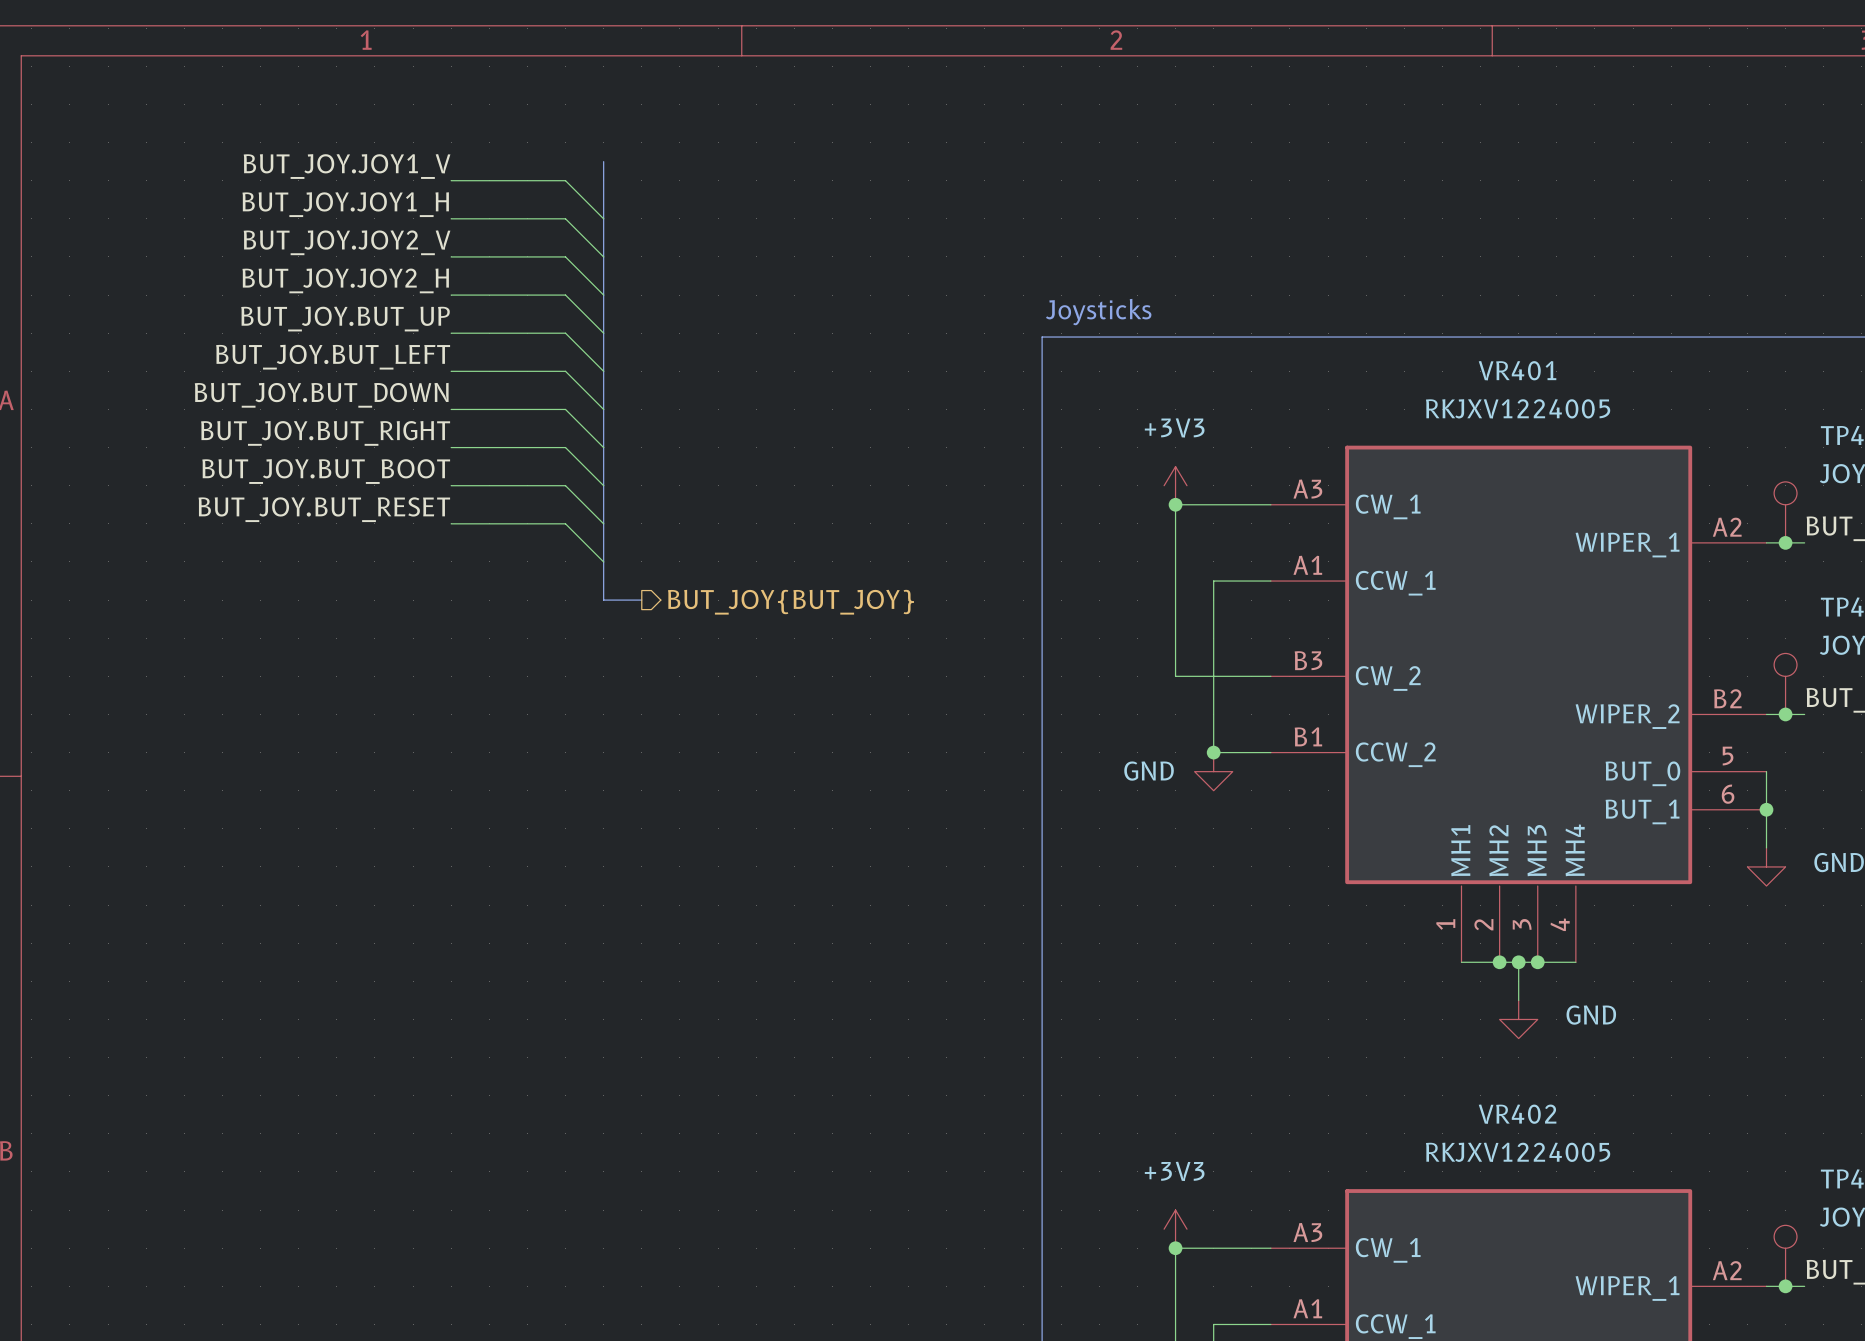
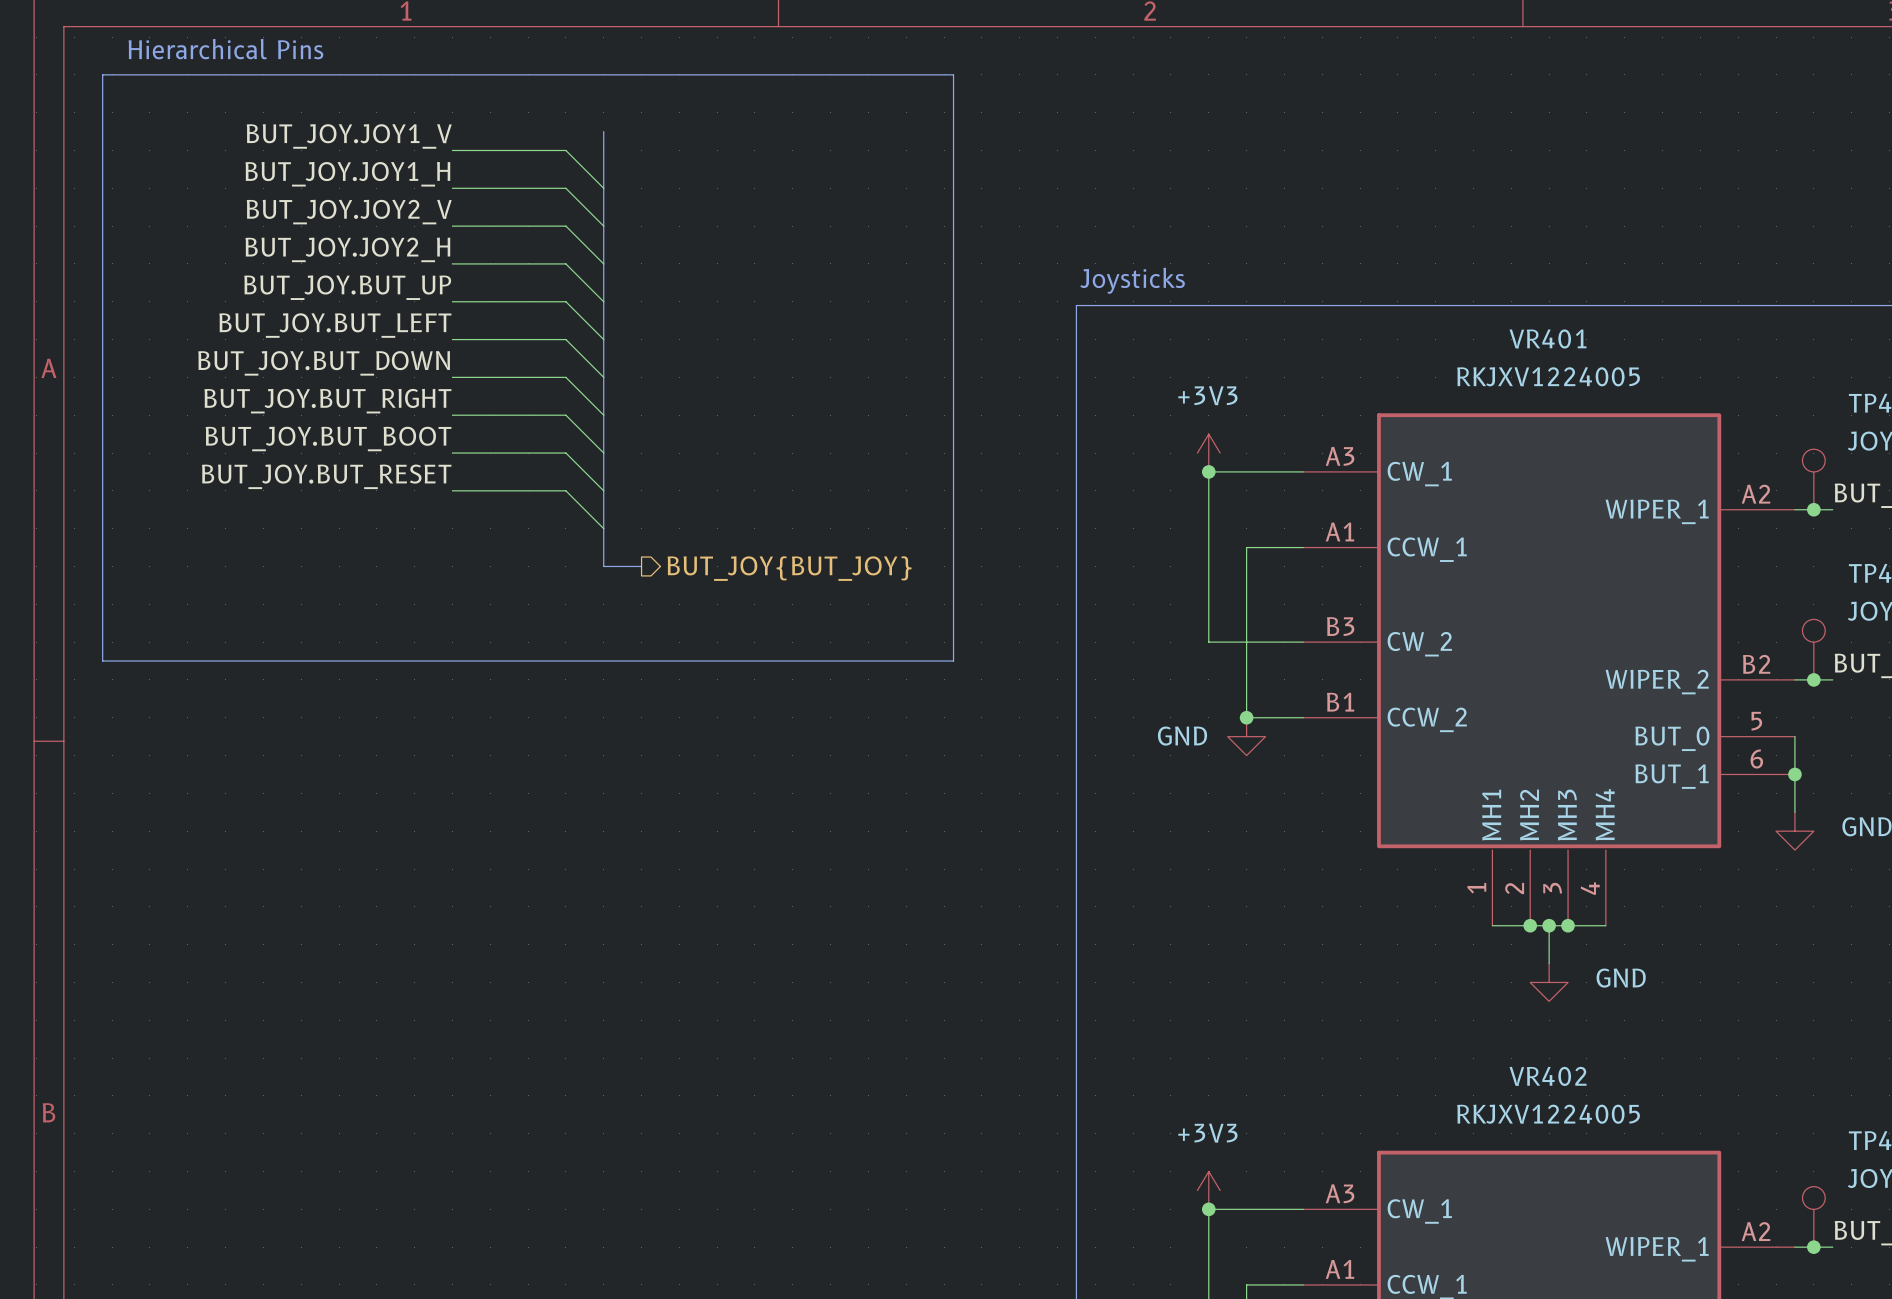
text: none -> Hierarchical Pins (225, 49)
line: none -> (102, 74) (953, 74) (953, 661) (102, 661) (102, 74)
bus: (603, 161) (603, 600) (641, 600) -> (603, 131) (603, 566) (641, 566)
label position: BUT_JOY.JOY1_V (347, 166) -> BUT_JOY.JOY1_V (349, 136)
wire: none -> (452, 150) (490, 150)
wire: (527, 180) (565, 180) (603, 218) -> (565, 150) (603, 188)
label position: BUT_JOY.JOY1_H (345, 204) -> BUT_JOY.JOY1_H (347, 174)
wire: none -> (452, 188) (490, 188)
wire: (527, 218) (565, 218) (603, 256) -> (565, 188) (603, 226)
label position: BUT_JOY.JOY2_V (347, 242) -> BUT_JOY.JOY2_V (349, 212)
wire: none -> (452, 226) (490, 226)
wire: (527, 256) (565, 256) (603, 295) -> (565, 226) (603, 263)
label position: BUT_JOY.JOY2_H (345, 280) -> BUT_JOY.JOY2_H (347, 249)
wire: none -> (452, 263) (490, 263)
wire: (527, 295) (565, 295) (603, 333) -> (565, 263) (603, 301)
label position: BUT_JOY.BUT_UP (345, 319) -> BUT_JOY.BUT_UP (347, 287)
wire: none -> (452, 301) (490, 301)
wire: (527, 333) (565, 333) (603, 371) -> (565, 301) (603, 339)
label position: BUT_JOY.BUT_LEFT (333, 357) -> BUT_JOY.BUT_LEFT (335, 325)
wire: none -> (452, 339) (490, 339)
wire: (527, 371) (565, 371) (603, 409) -> (565, 339) (603, 377)
label position: BUT_JOY.BUT_DOWN (321, 395) -> BUT_JOY.BUT_DOWN (324, 363)
wire: none -> (452, 377) (490, 377)
wire: (527, 409) (565, 409) (603, 447) -> (565, 377) (603, 415)
label position: BUT_JOY.BUT_RIGHT (325, 433) -> BUT_JOY.BUT_RIGHT (327, 401)
wire: none -> (452, 415) (490, 415)
wire: (527, 447) (565, 447) (603, 485) -> (565, 415) (603, 453)
label position: BUT_JOY.BUT_BOOT (326, 471) -> BUT_JOY.BUT_BOOT (328, 438)
wire: none -> (452, 453) (490, 453)
wire: (527, 485) (565, 485) (603, 523) -> (565, 453) (603, 490)
label position: BUT_JOY.BUT_RESET (324, 509) -> BUT_JOY.BUT_RESET (326, 476)
wire: none -> (452, 490) (490, 490)
wire: (527, 523) (565, 523) (603, 561) -> (565, 490) (603, 528)
hierarchical label position: BUT_JOY{BUT_JOY} (790, 602) -> BUT_JOY{BUT_JOY} (789, 568)

